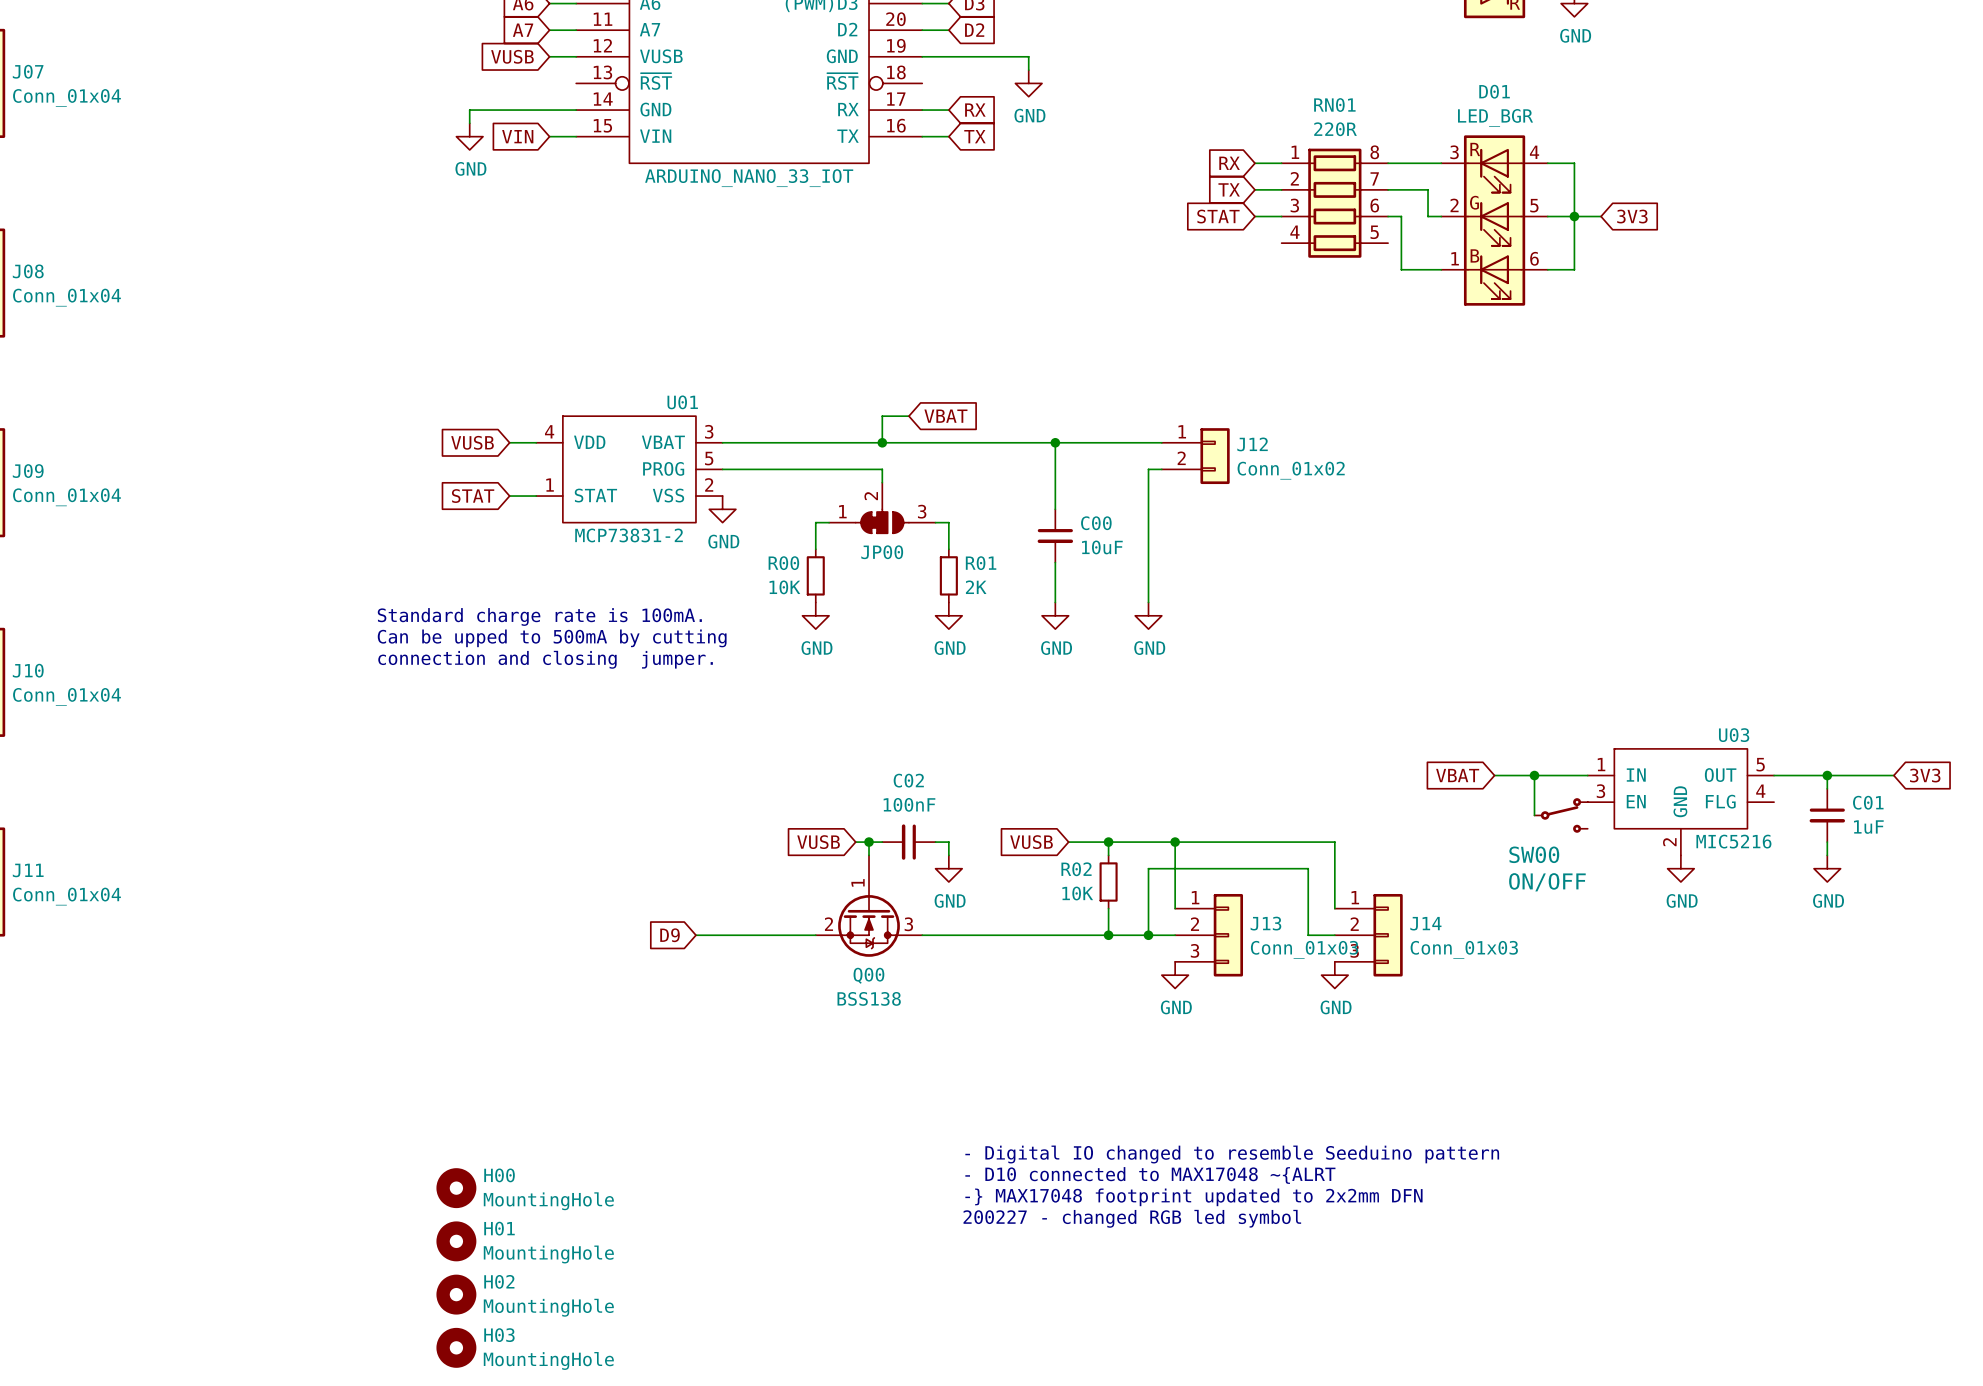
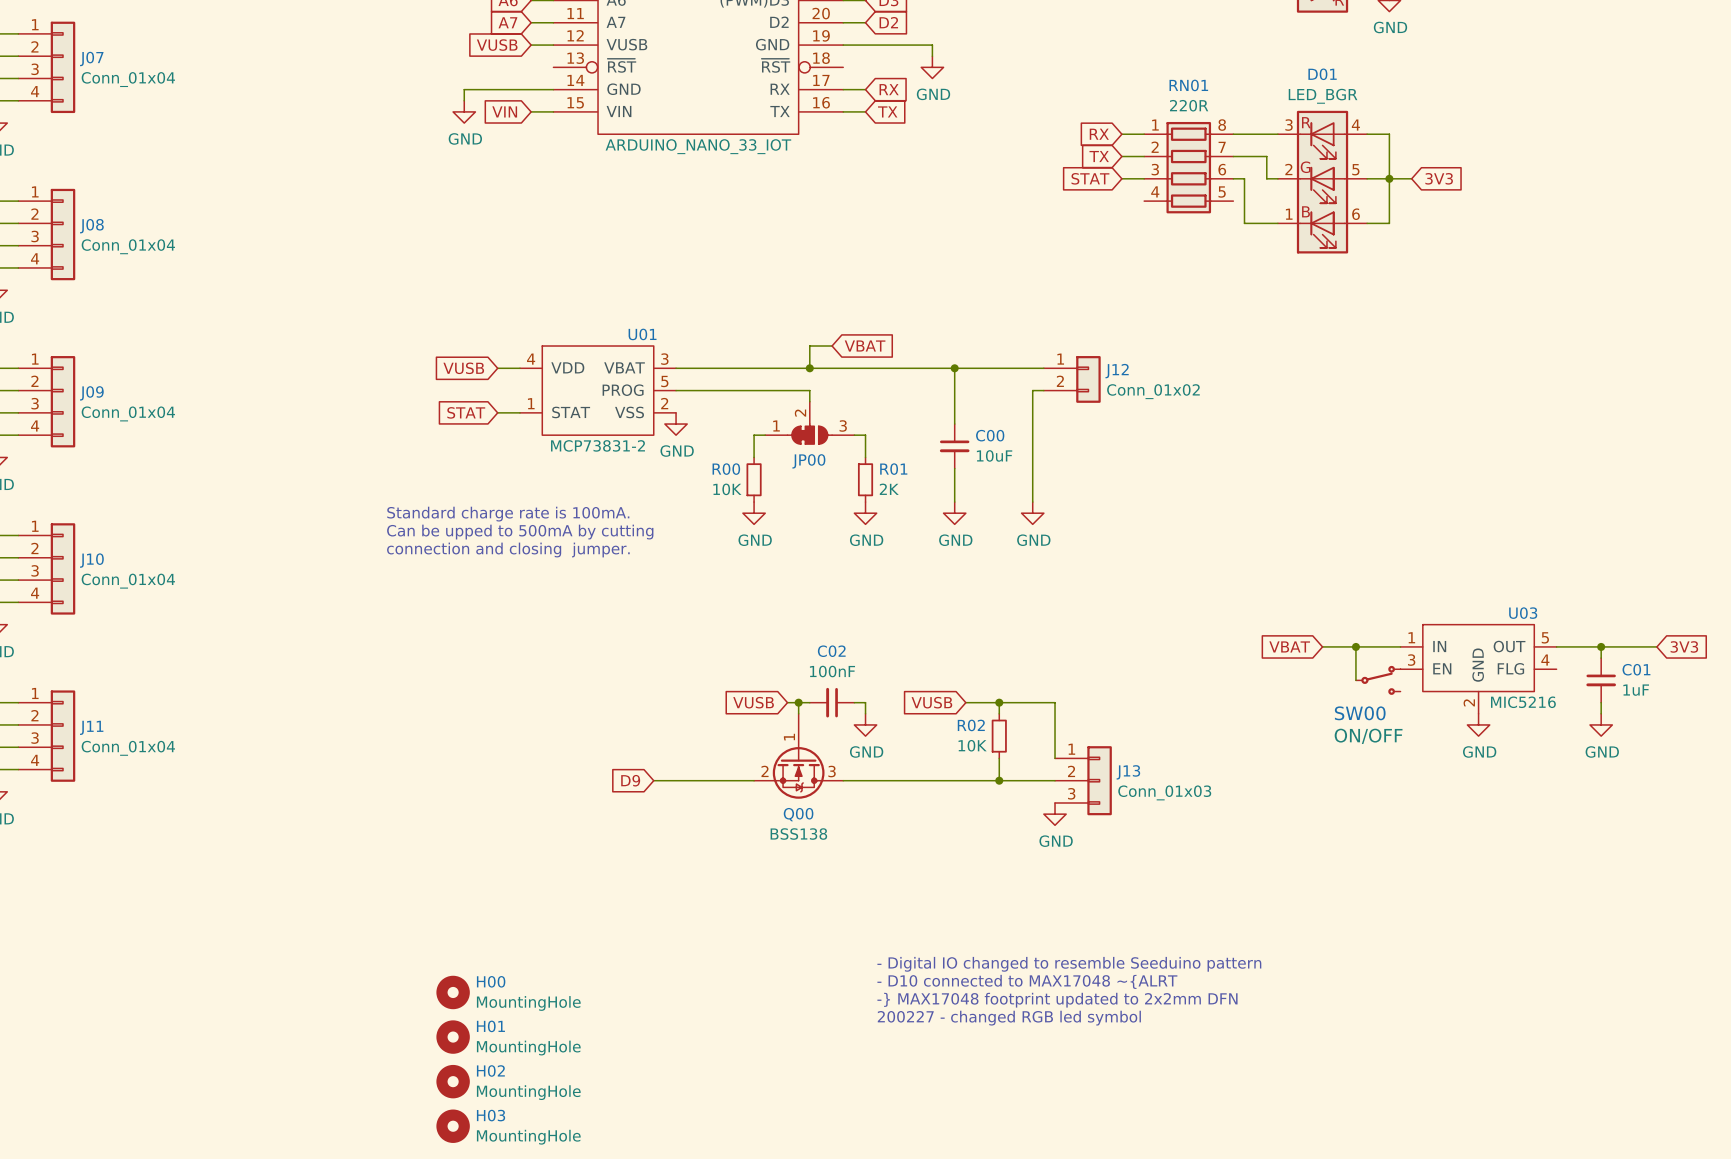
wire: (1175, 842) (1334, 842) (1334, 908) -> none
junction: (1175, 842) -> none
wire: (1148, 935) (1148, 868) (1308, 868) (1308, 935) (1334, 935) -> none
junction: (1148, 935) -> none
J14: Conn_01x03 (1368, 935) -> none
power symbol: GND (1334, 975) -> none

